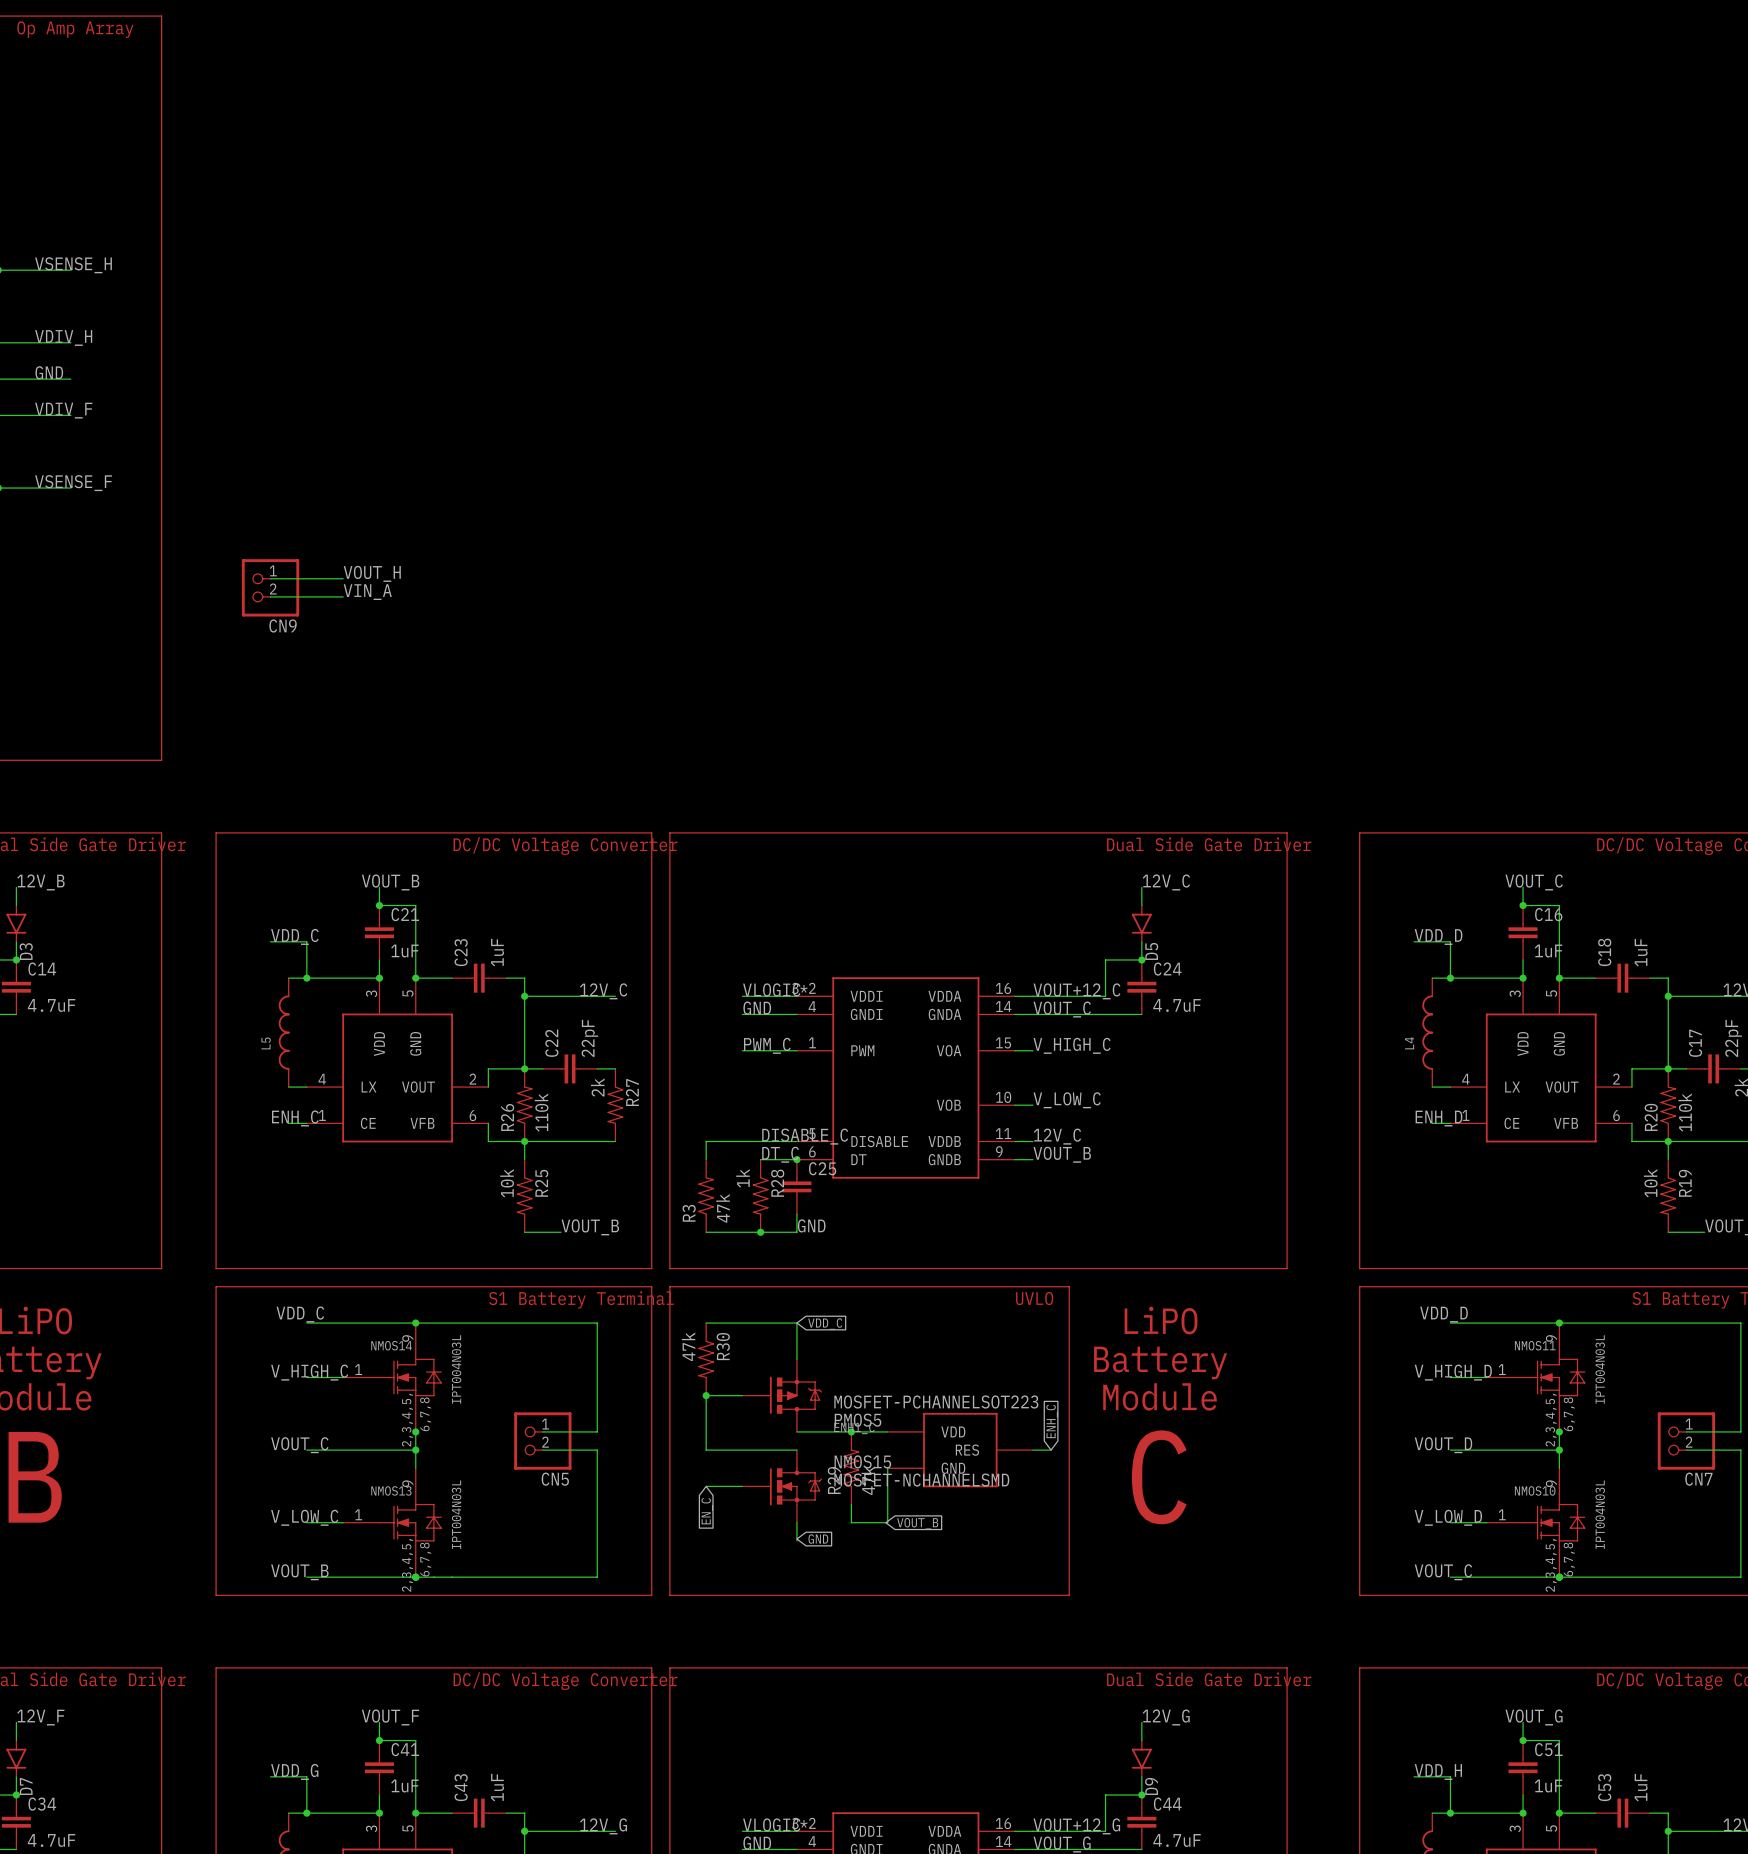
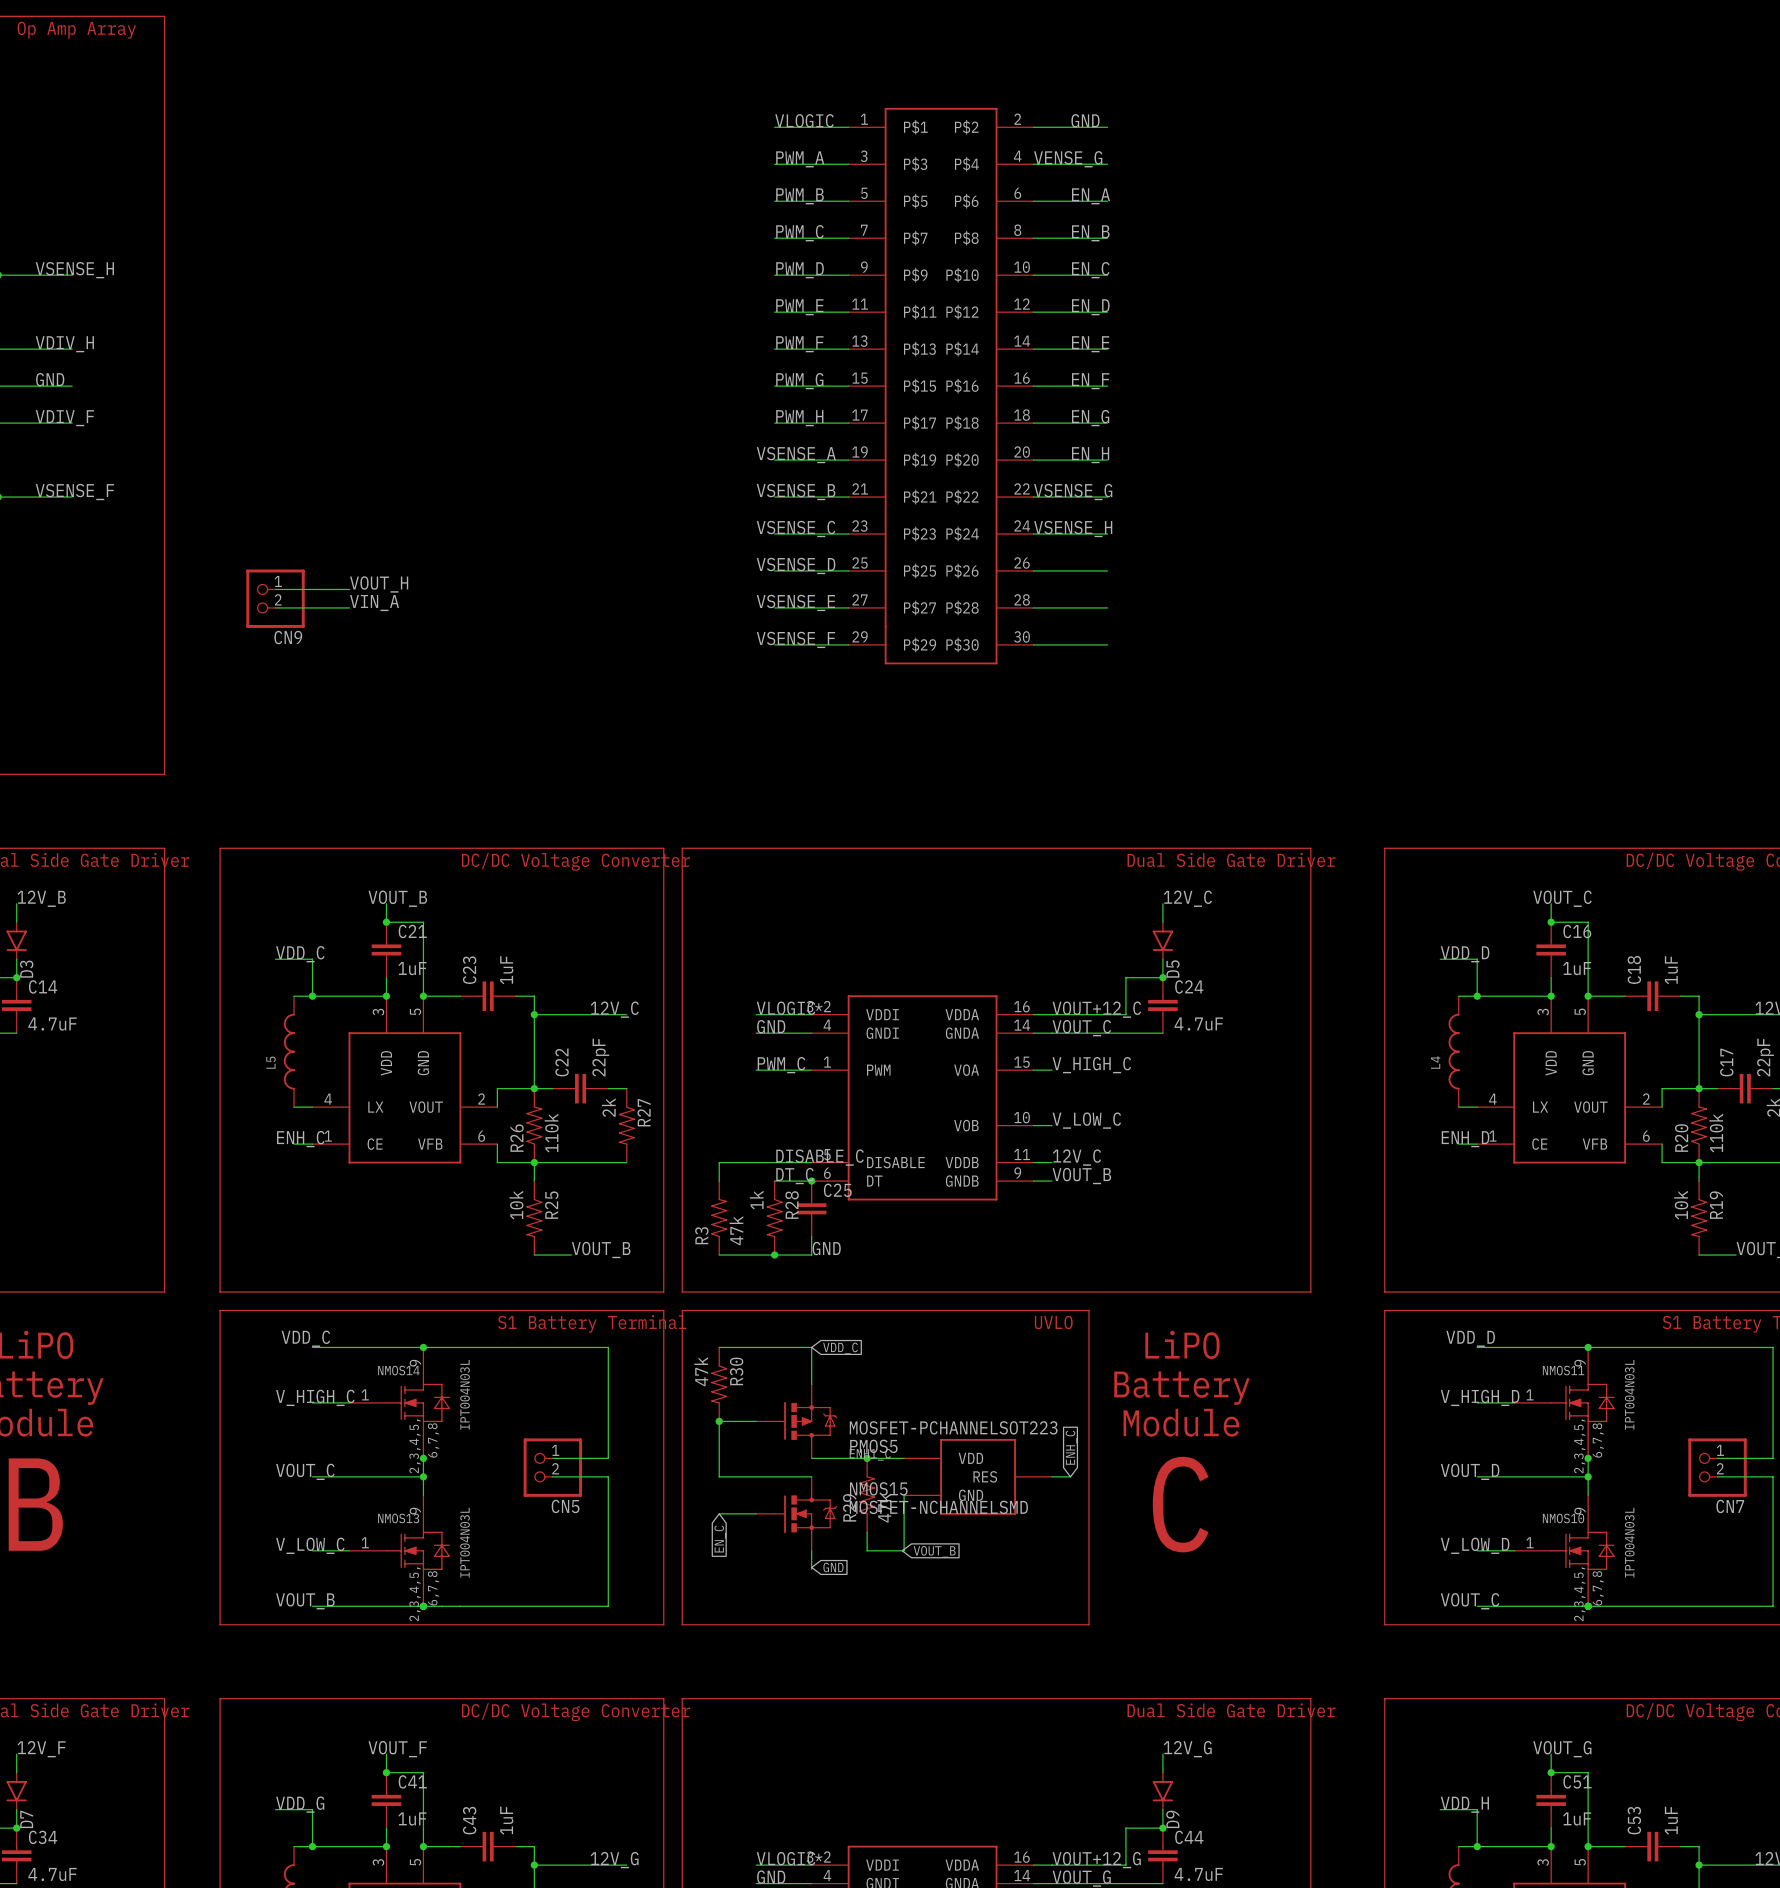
label: none -> VLOGIC (804, 120)
label: none -> GND (1085, 120)
wire: none -> (774, 127) (848, 127)
wire: none -> (1033, 127) (1107, 127)
label: none -> PWM_A (800, 159)
label: none -> VENSE_G (1068, 159)
wire: none -> (774, 164) (848, 164)
wire: none -> (1033, 164) (1107, 164)
label: none -> PWM_B (799, 196)
label: none -> EN_A (1091, 196)
wire: none -> (774, 201) (848, 201)
wire: none -> (1033, 201) (1107, 201)
label: none -> PWM_C (799, 233)
label: none -> EN_B (1090, 233)
wire: none -> (774, 238) (848, 238)
wire: none -> (1033, 238) (1107, 238)
label: none -> PWM_D (800, 270)
label: none -> EN_C (1090, 270)
wire: none -> (774, 275) (848, 275)
wire: none -> (1033, 275) (1107, 275)
label: none -> PWM_E (799, 307)
label: none -> EN_D (1090, 307)
wire: none -> (774, 312) (848, 312)
wire: none -> (1033, 312) (1107, 312)
label: none -> PWM_F (799, 344)
label: none -> EN_E (1090, 344)
wire: none -> (774, 349) (848, 349)
wire: none -> (1033, 349) (1107, 349)
label: none -> PWM_G (799, 381)
label: none -> EN_F (1090, 381)
wire: none -> (774, 386) (848, 386)
part: none -> (941, 386)
wire: none -> (1033, 386) (1107, 386)
label: none -> PWM_H (799, 418)
label: none -> EN_G (1090, 418)
wire: none -> (774, 423) (848, 423)
wire: none -> (1033, 423) (1107, 423)
label: none -> VSENSE_A (796, 455)
label: none -> EN_H (1090, 455)
wire: none -> (774, 460) (848, 460)
wire: none -> (1033, 460) (1107, 460)
label: none -> VSENSE_B (796, 492)
label: none -> VSENSE_G (1073, 492)
wire: none -> (774, 497) (848, 497)
wire: none -> (1033, 497) (1107, 497)
label: none -> VSENSE_C (796, 528)
label: none -> VSENSE_H (1073, 528)
wire: none -> (774, 534) (848, 534)
wire: none -> (1033, 534) (1107, 534)
label: none -> VSENSE_D (796, 565)
wire: none -> (774, 570) (848, 570)
wire: none -> (1033, 570) (1107, 570)
label: none -> VSENSE_E (795, 602)
wire: none -> (774, 607) (848, 607)
wire: none -> (1033, 607) (1107, 607)
label: none -> VSENSE_F (795, 639)
wire: none -> (774, 644) (848, 644)
wire: none -> (1033, 644) (1107, 644)

